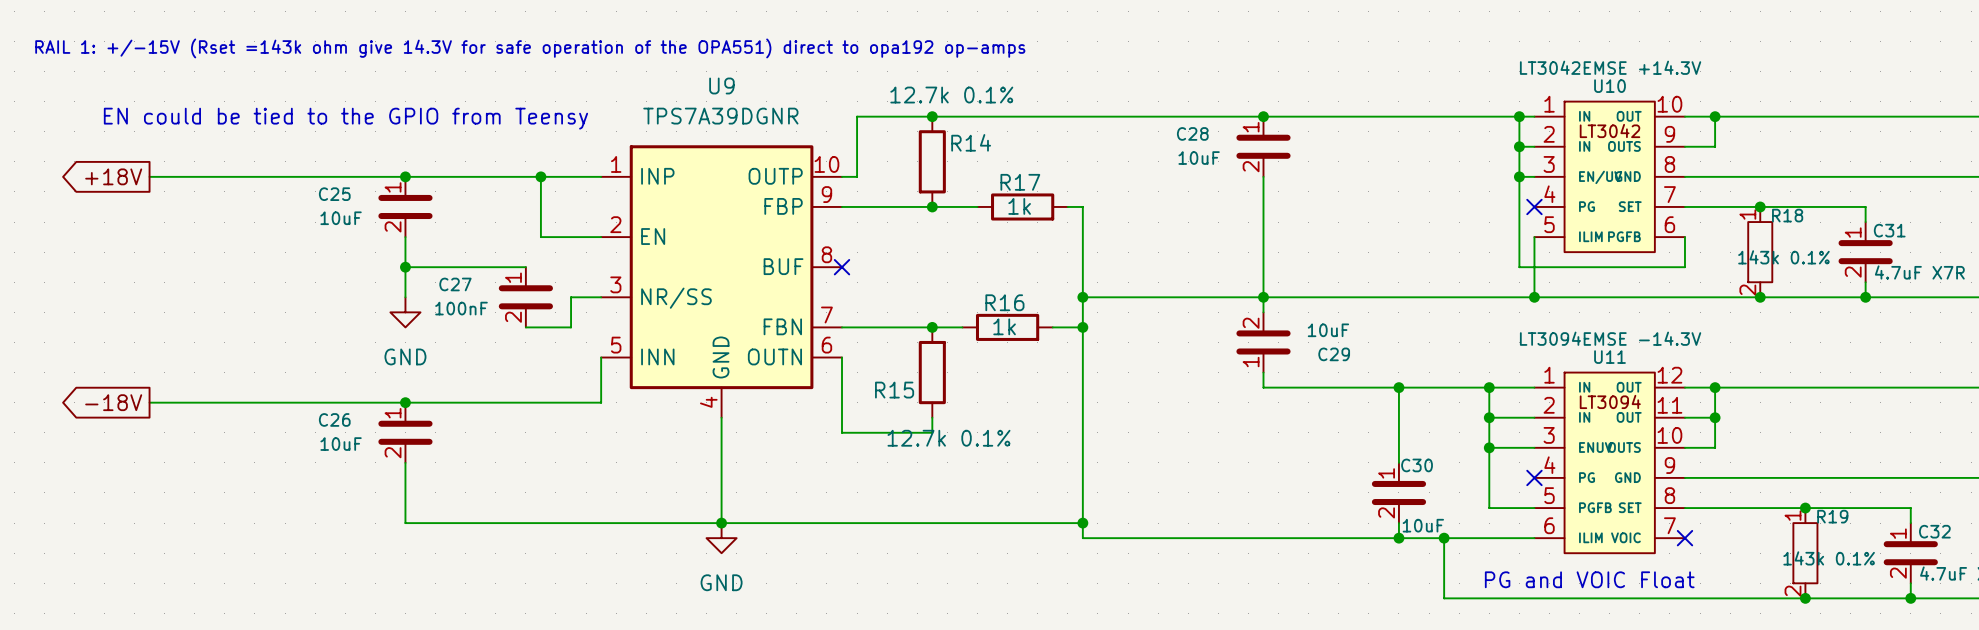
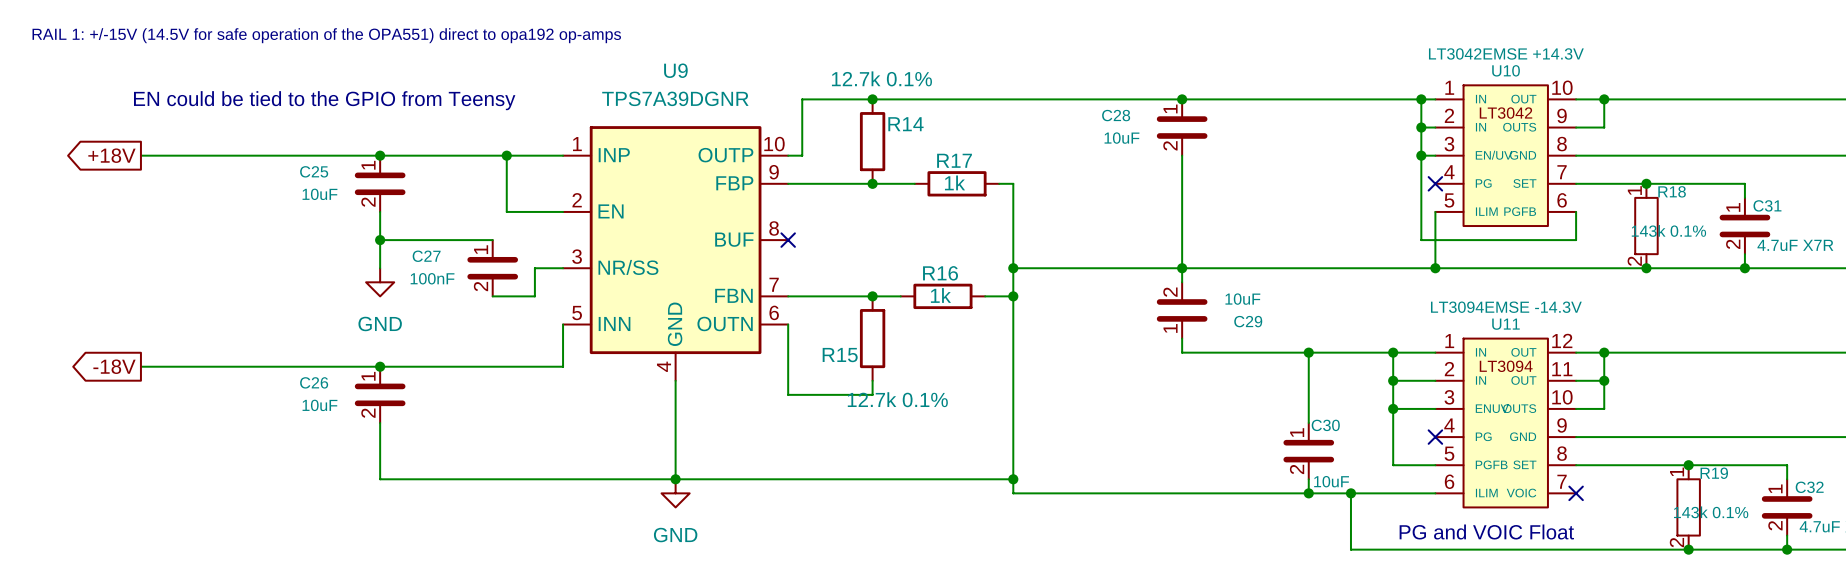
text: RAIL 1: +/-15V (Rset =143k ohm give 14.3V for safe operation of the OPA551) direct to opa192 op-amps (530, 48) -> RAIL 1: +/-15V (14.5V for safe operation of the OPA551) direct to opa192 op-amps (326, 35)

